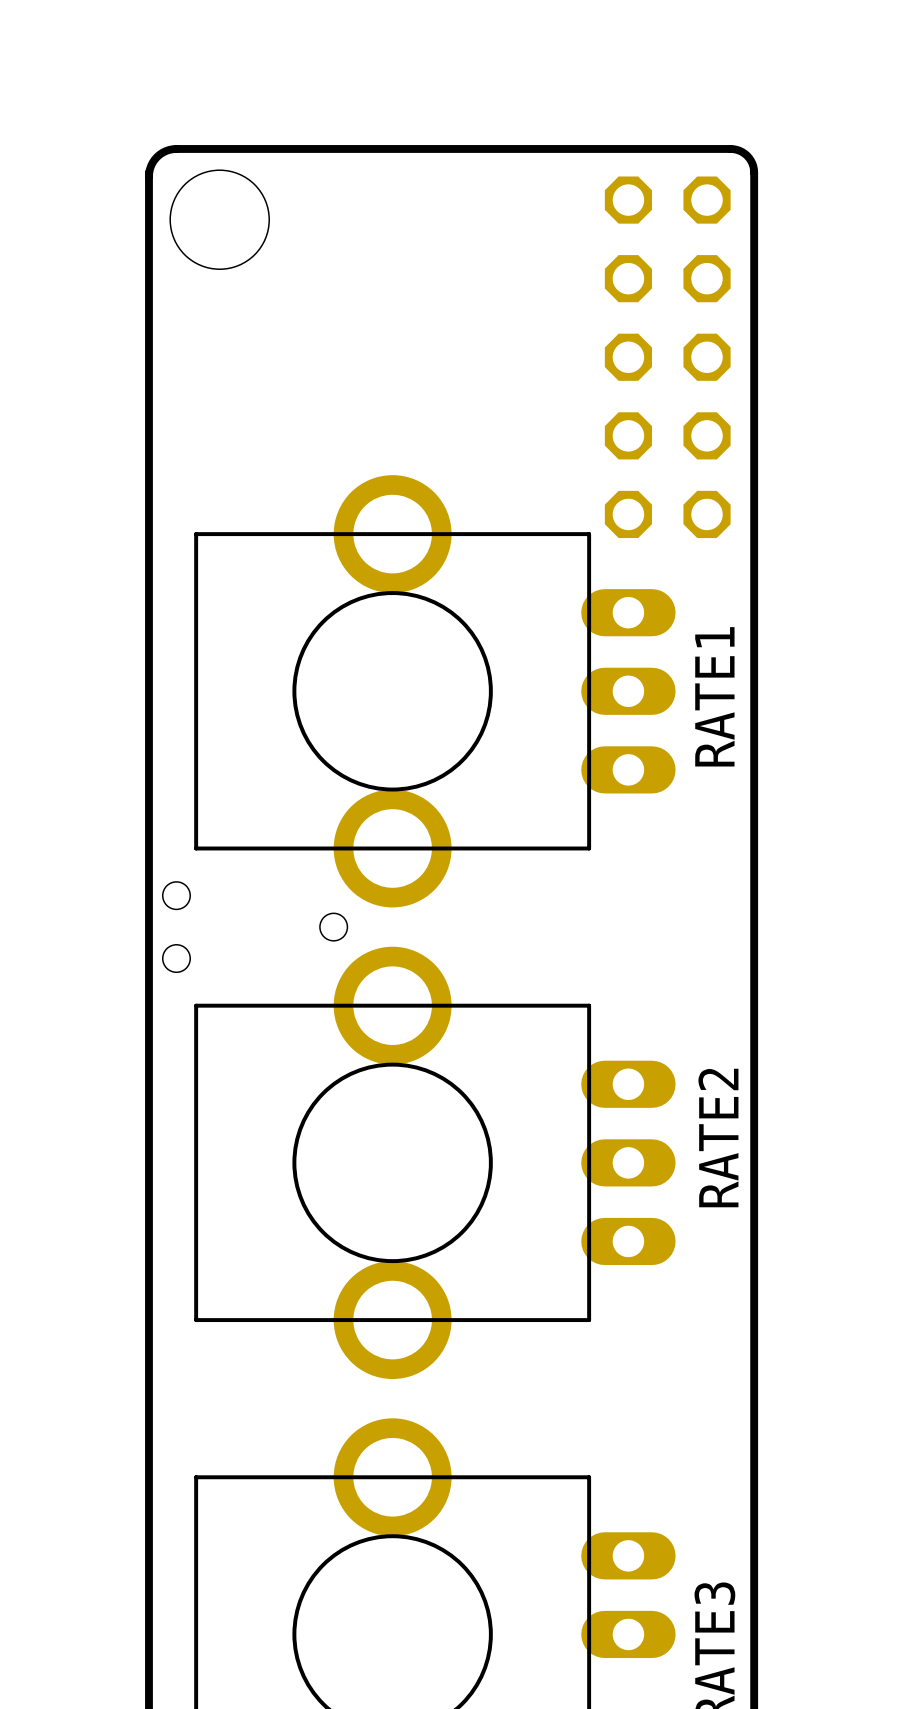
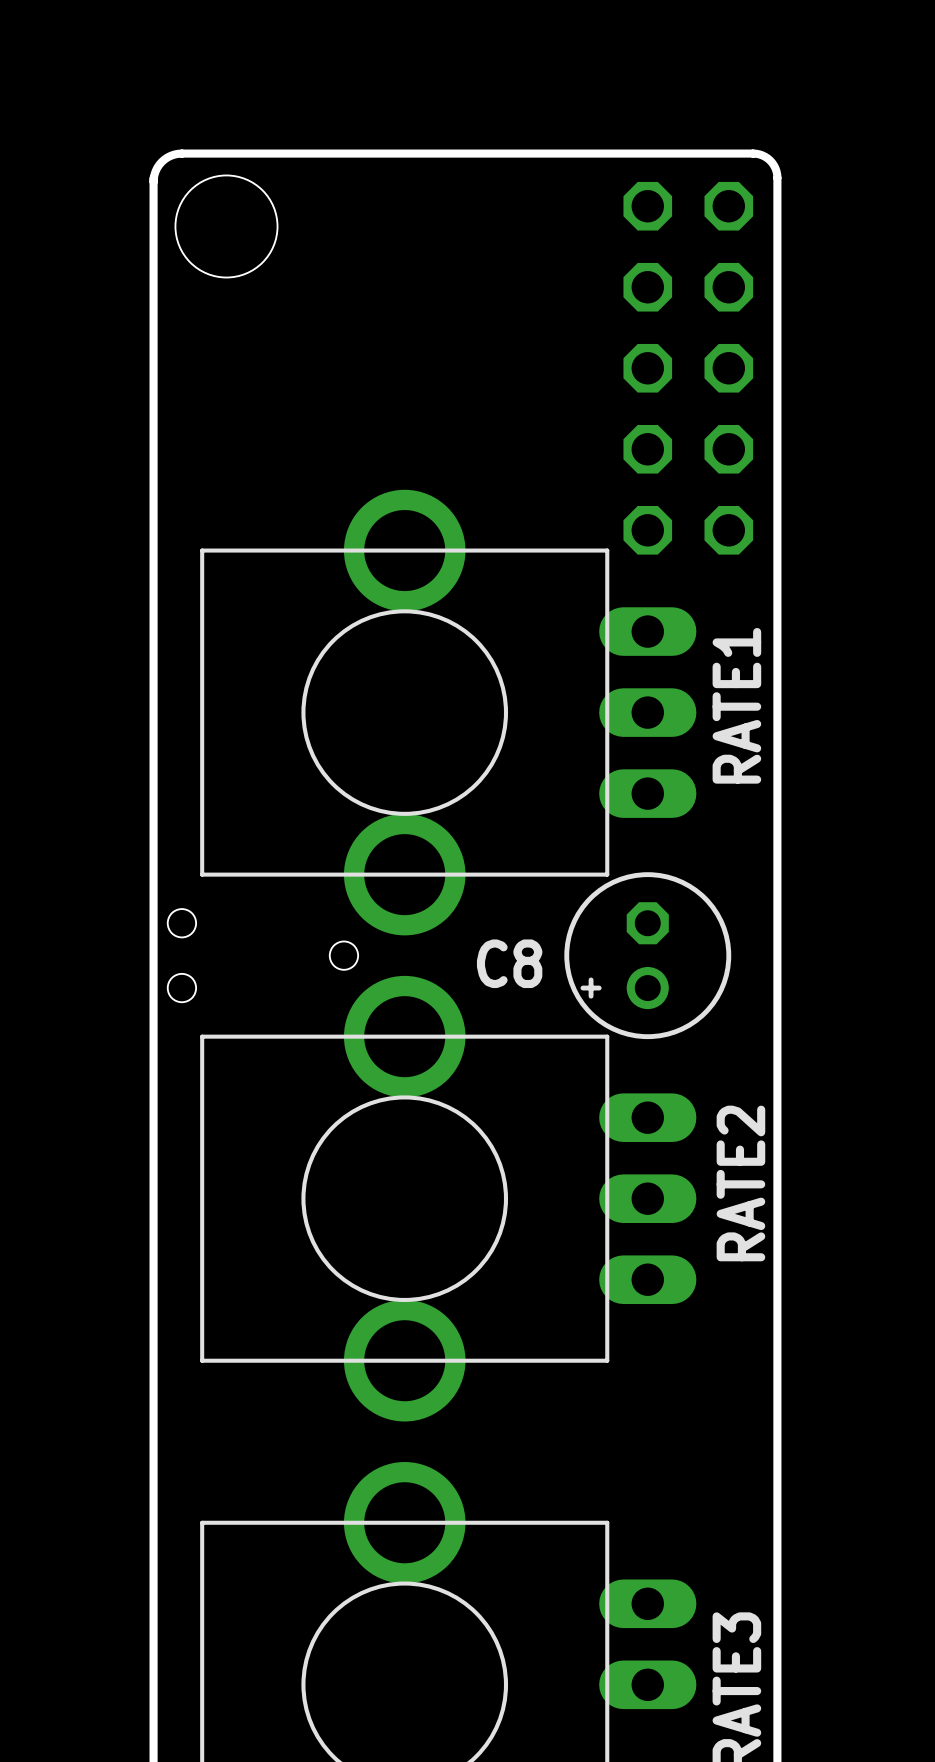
C8: none -> (647, 955)

